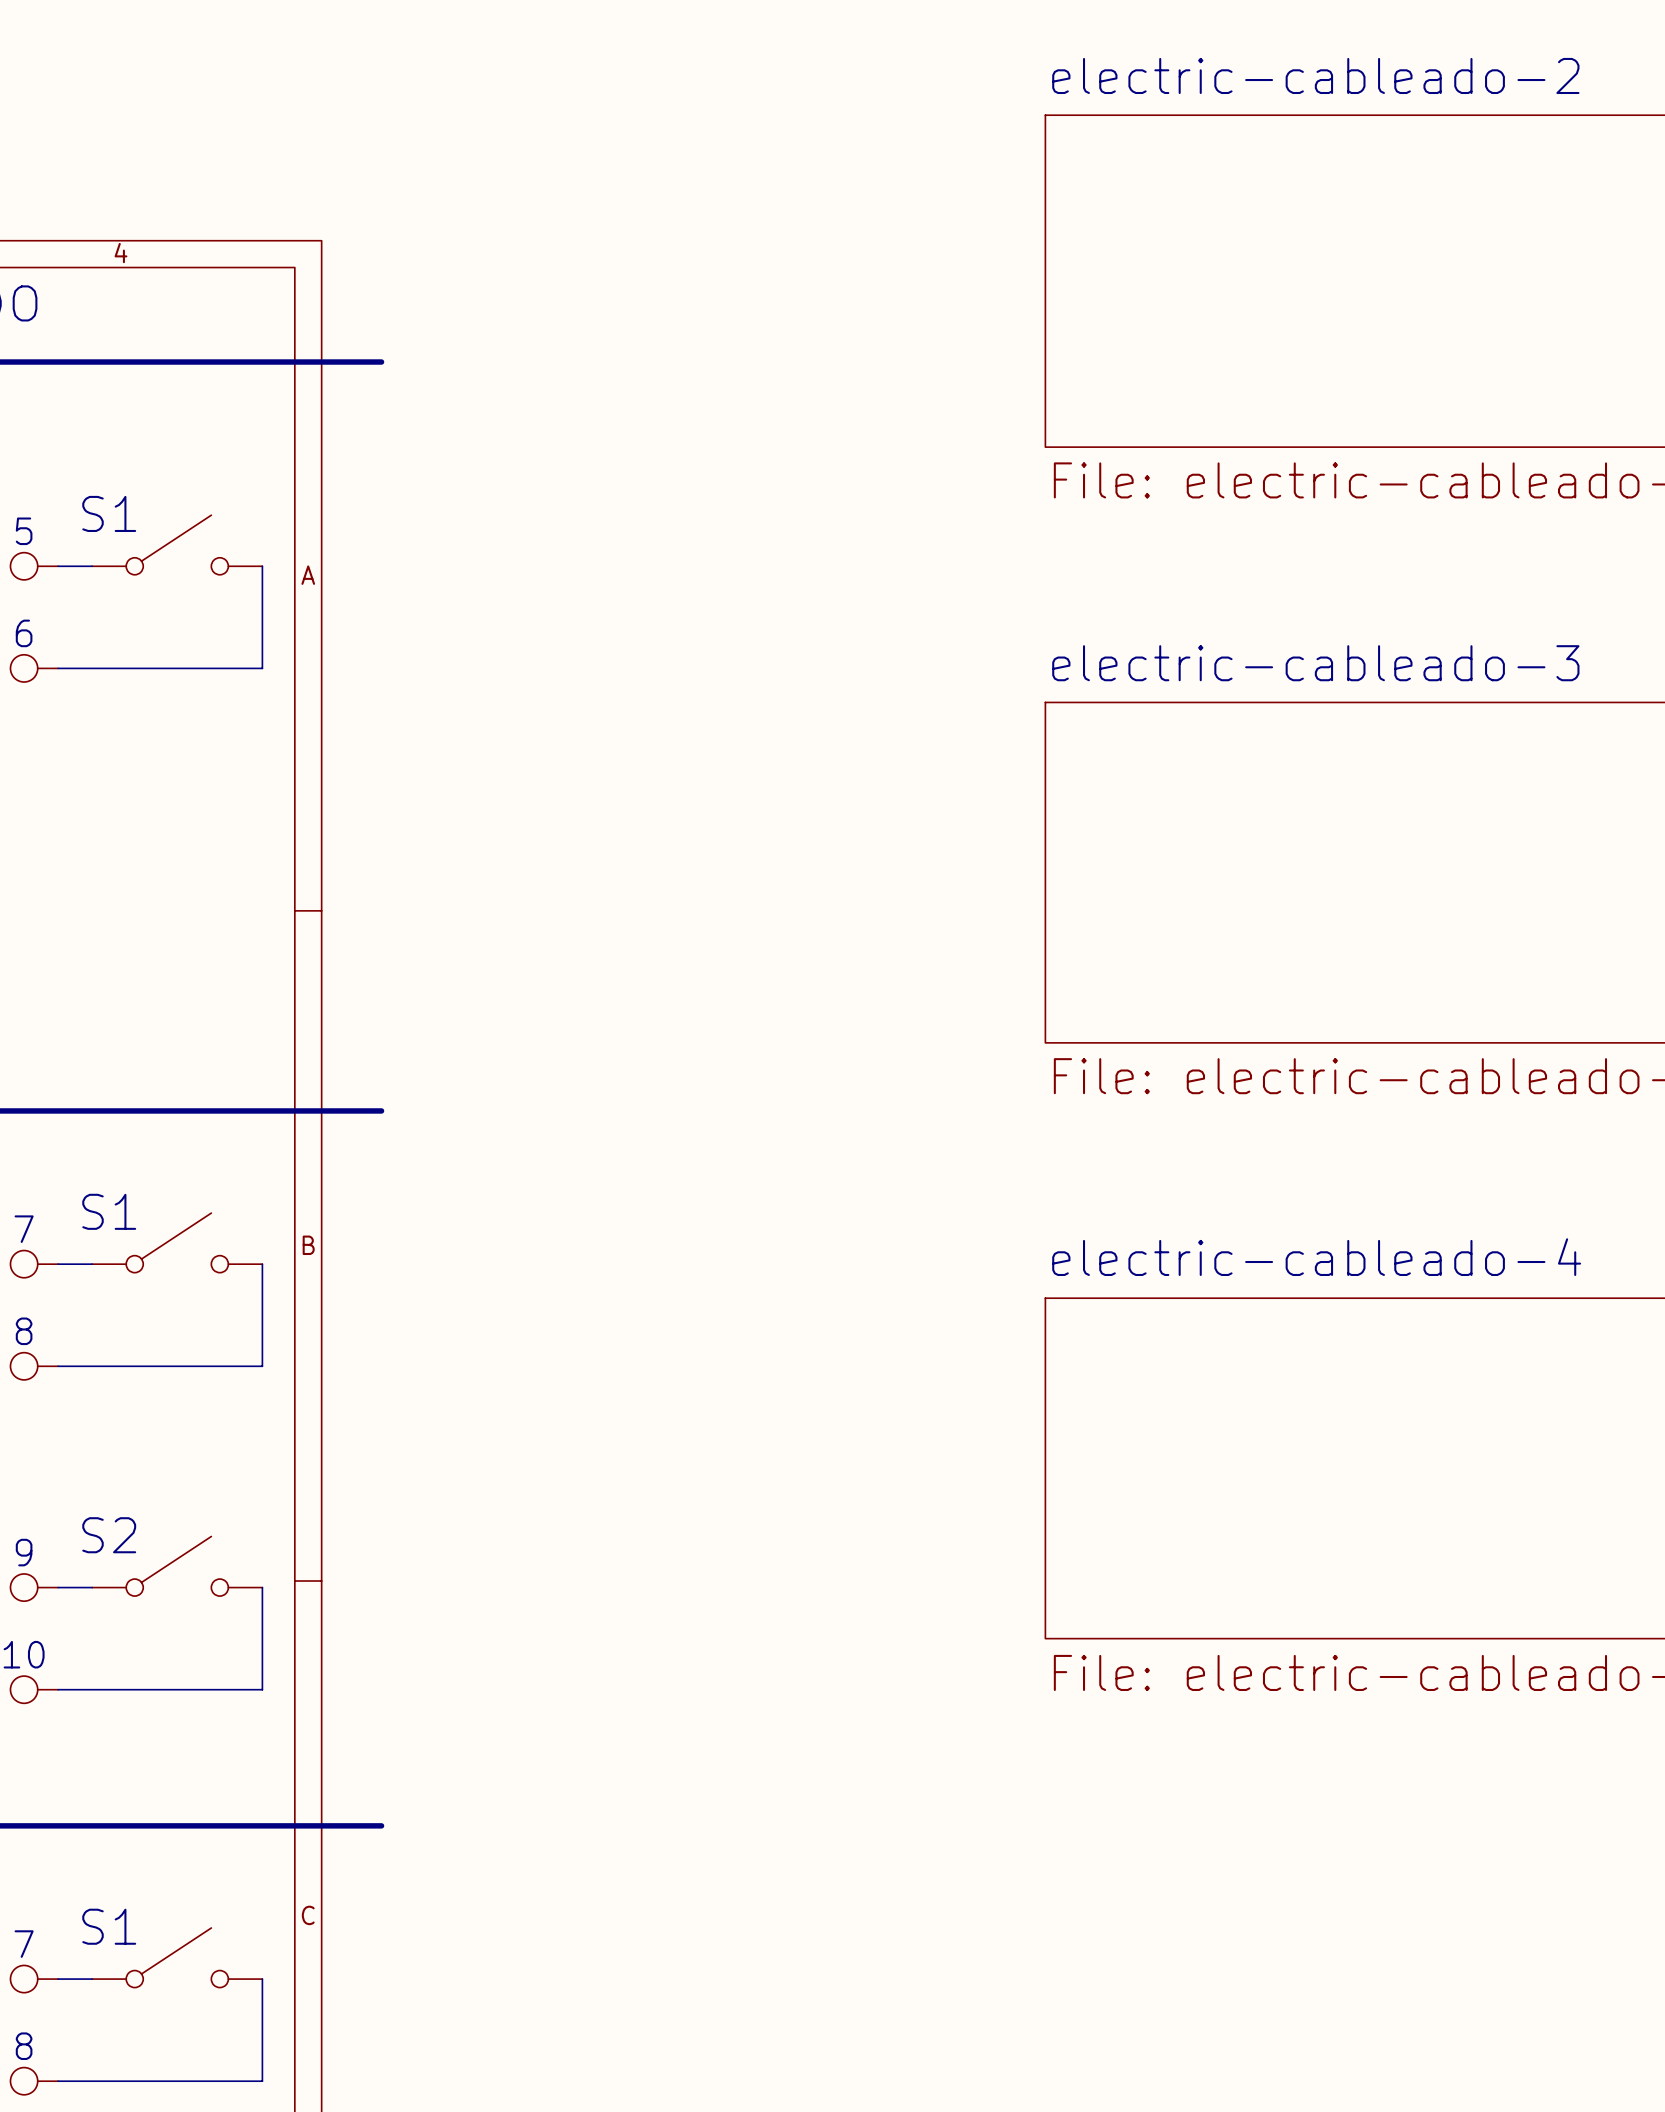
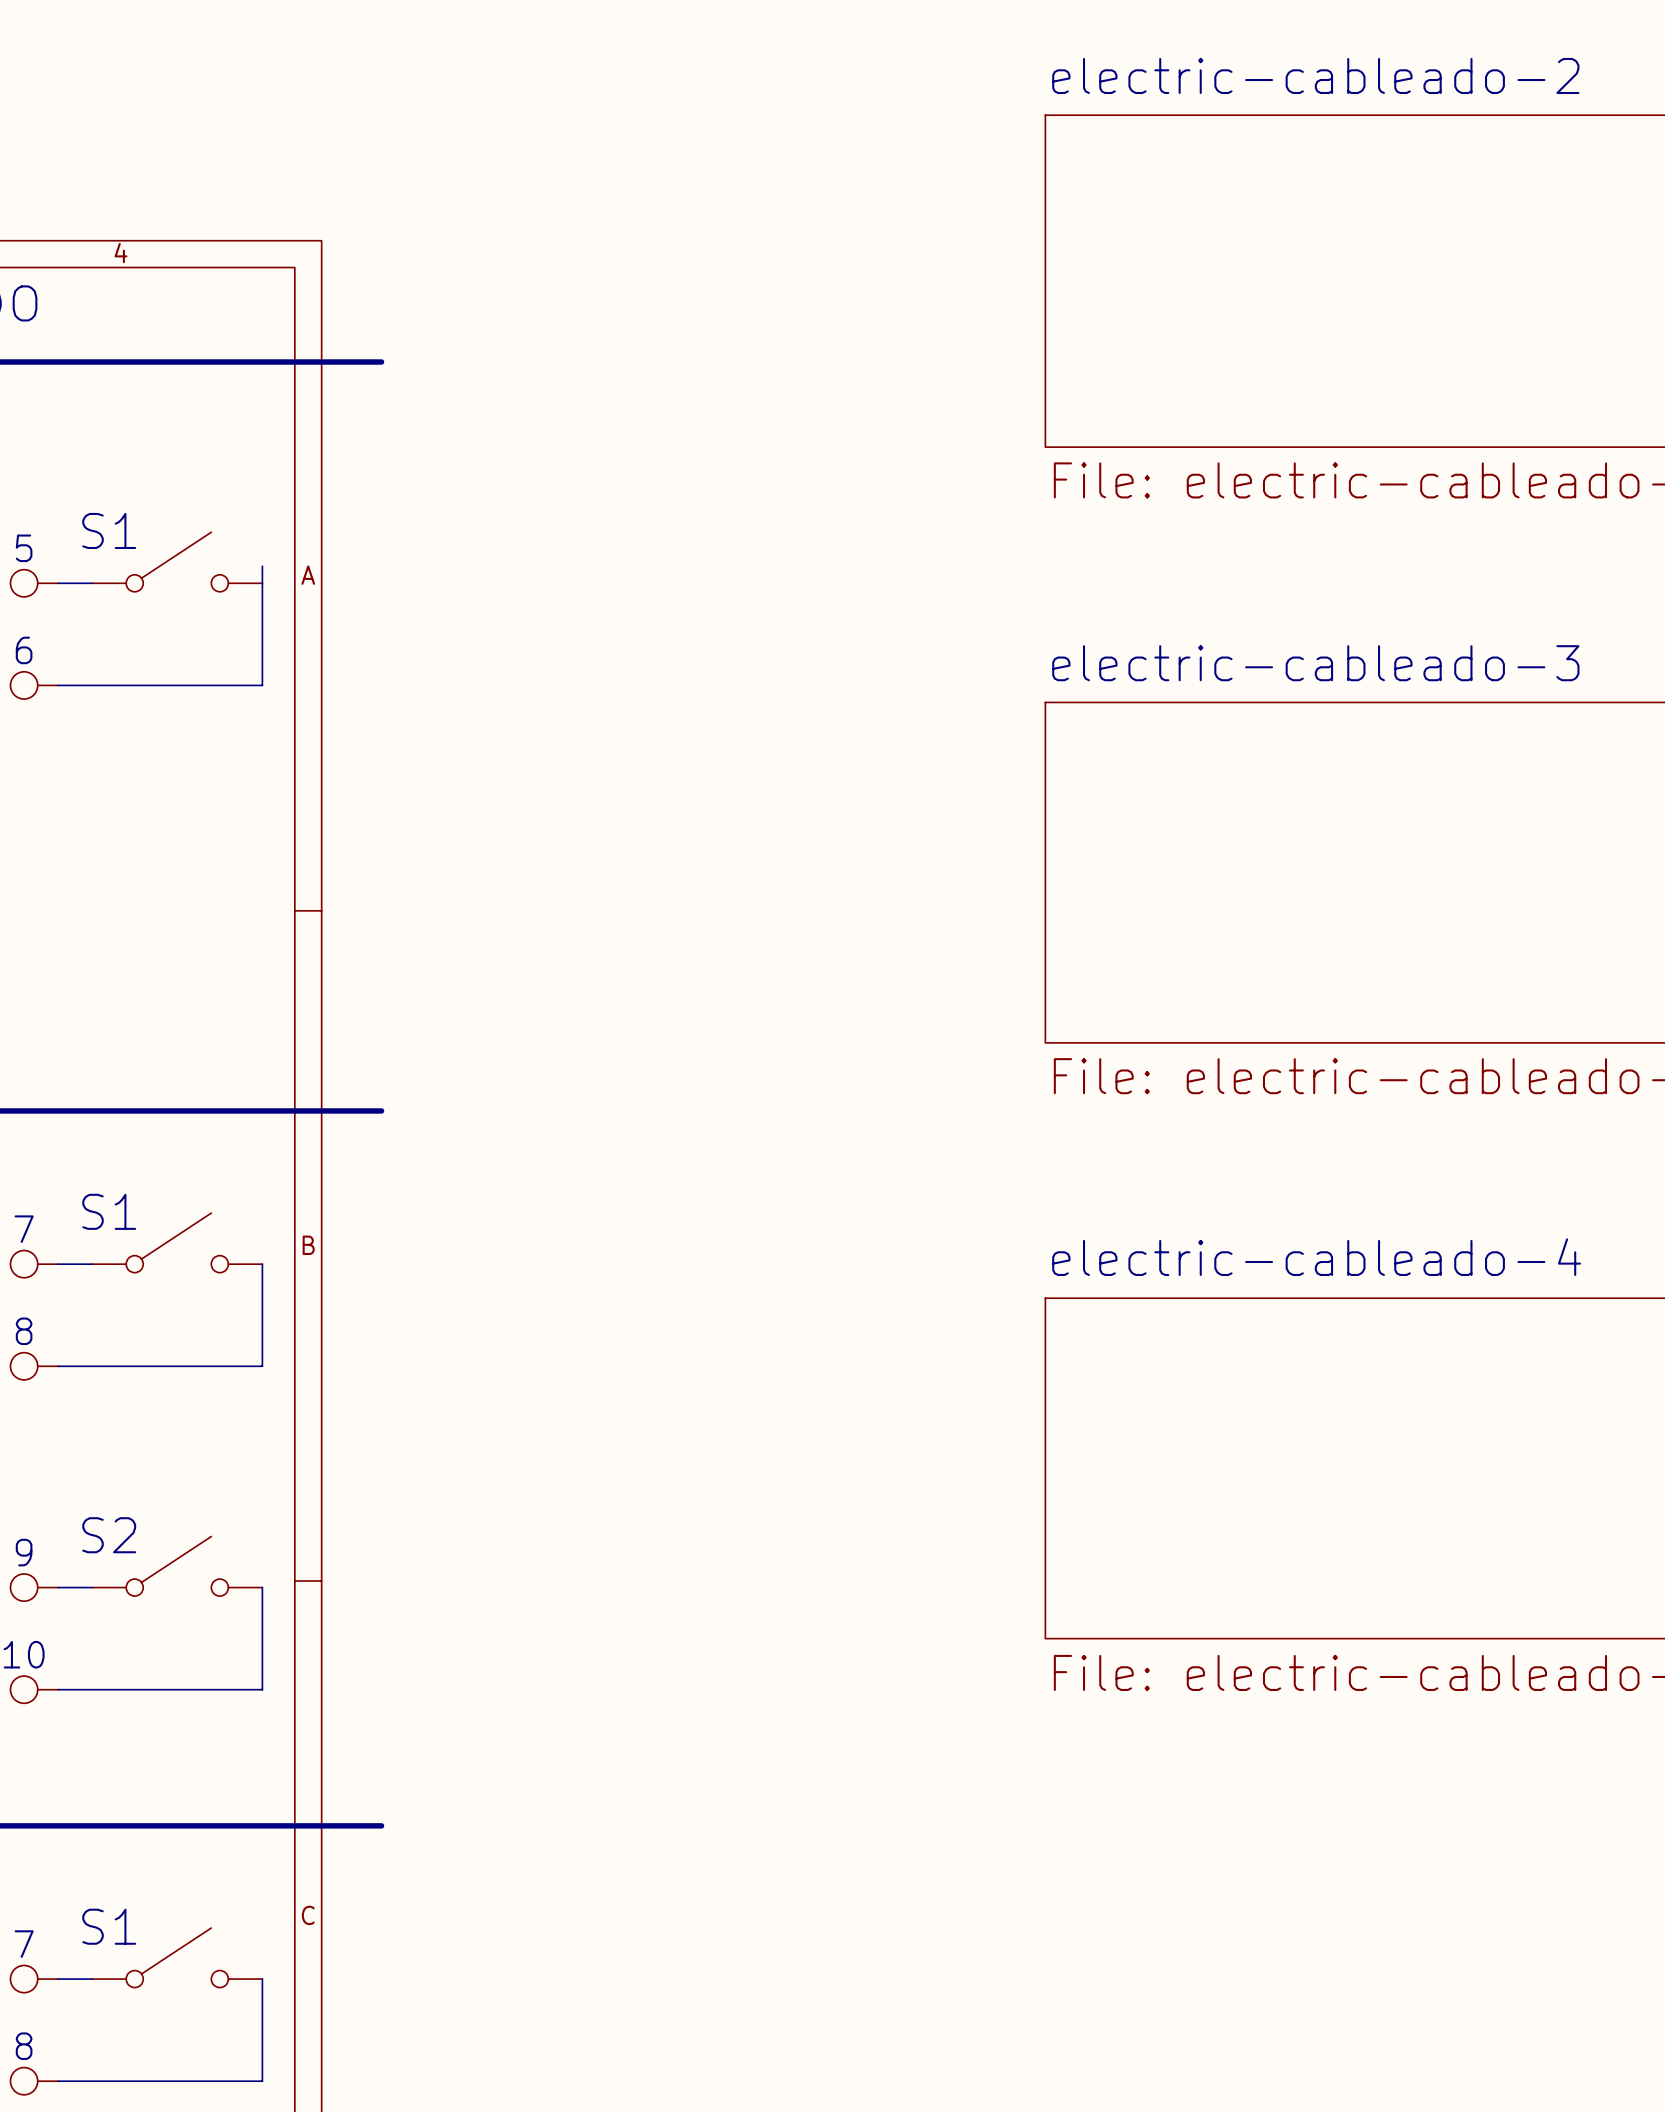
S1 position: (177, 545) -> (177, 562)
part position: (34, 566) -> (34, 583)
wire: (58, 566) (92, 566) -> (58, 583) (92, 583)
part position: (34, 668) -> (34, 685)
wire: (58, 668) (262, 668) -> (58, 685) (262, 685) (262, 668)

